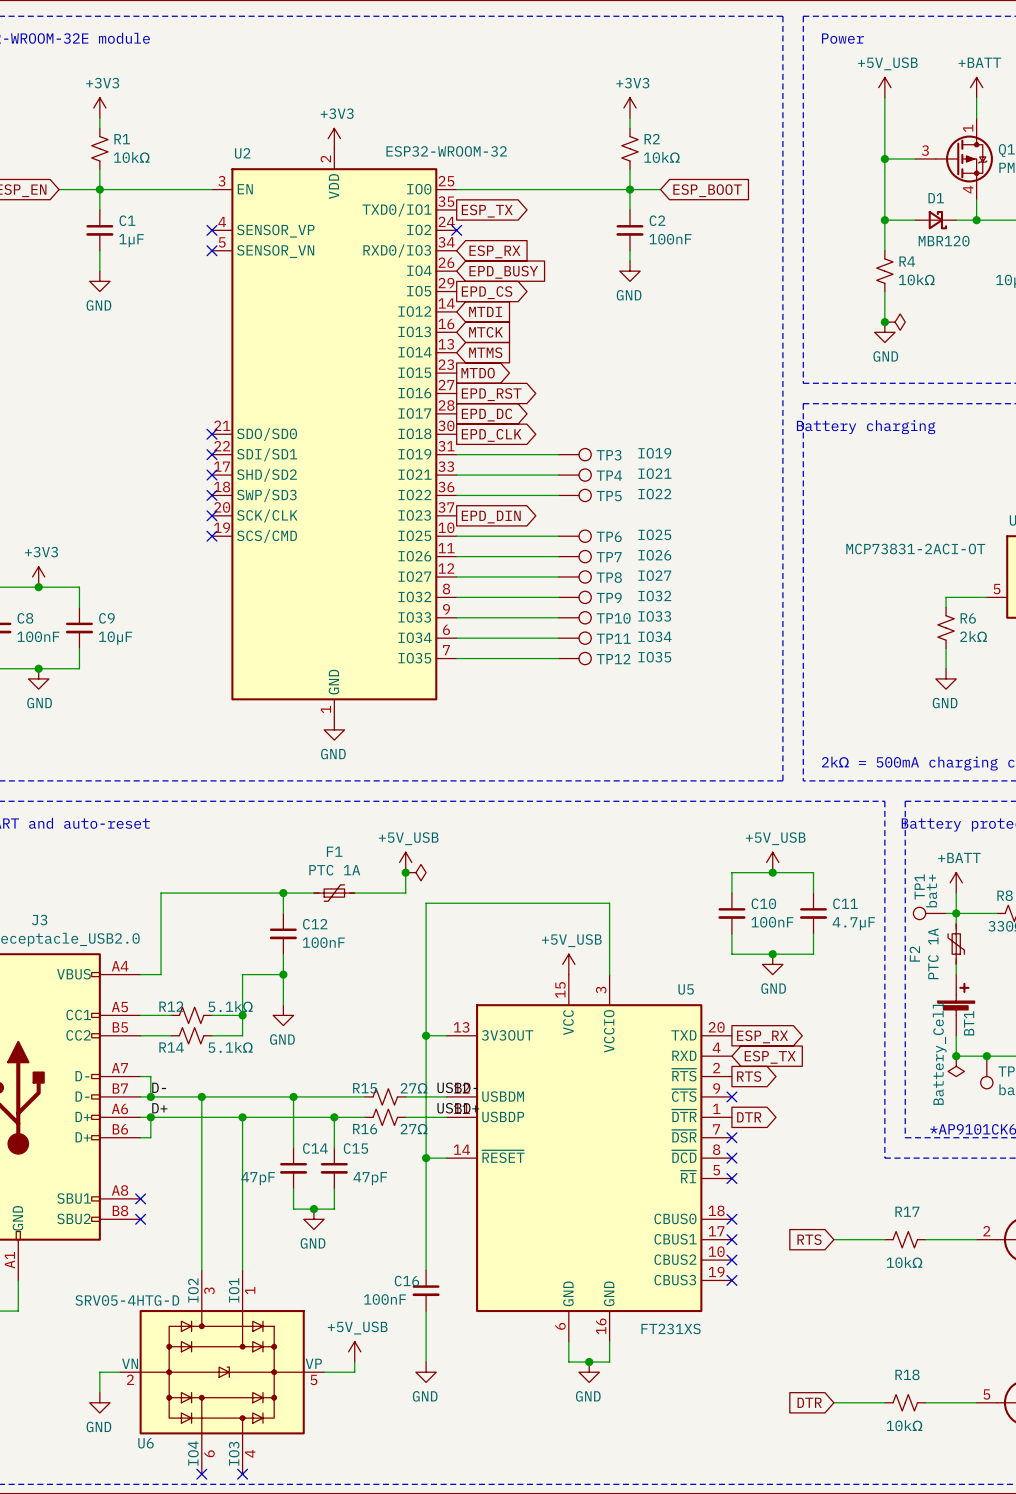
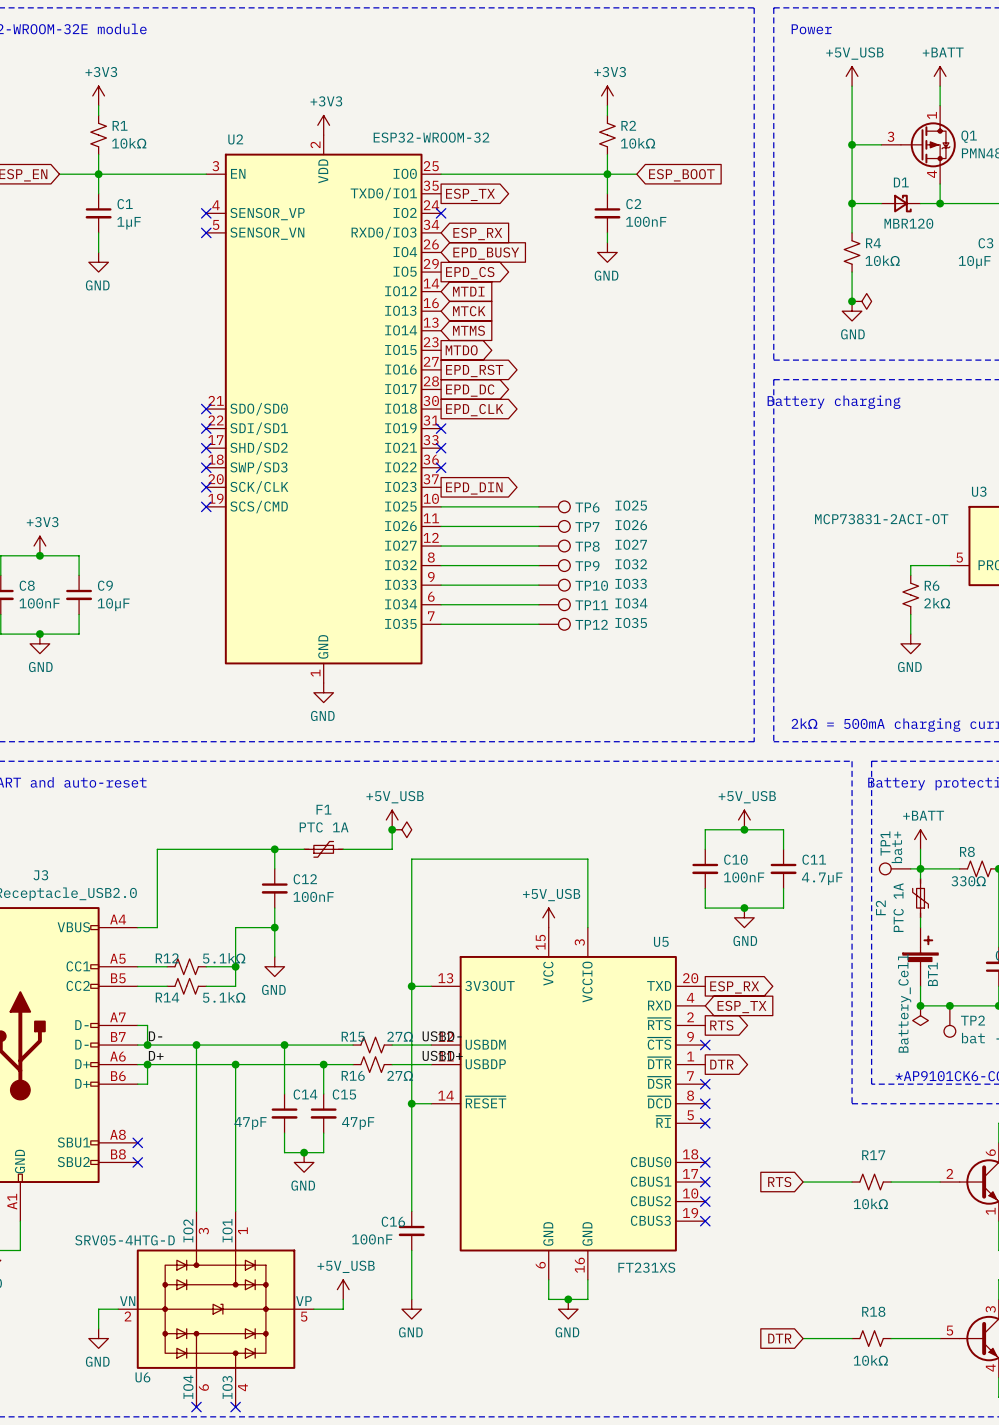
wire: (456, 454) (558, 454) -> none
no-connect mark: none -> (441, 428)
TP3: IO19 (574, 454) -> none
wire: (456, 475) (558, 475) -> none
no-connect mark: none -> (441, 448)
TP4: IO21 (574, 475) -> none
wire: (456, 495) (558, 495) -> none
no-connect mark: none -> (441, 467)
TP5: IO22 (574, 495) -> none

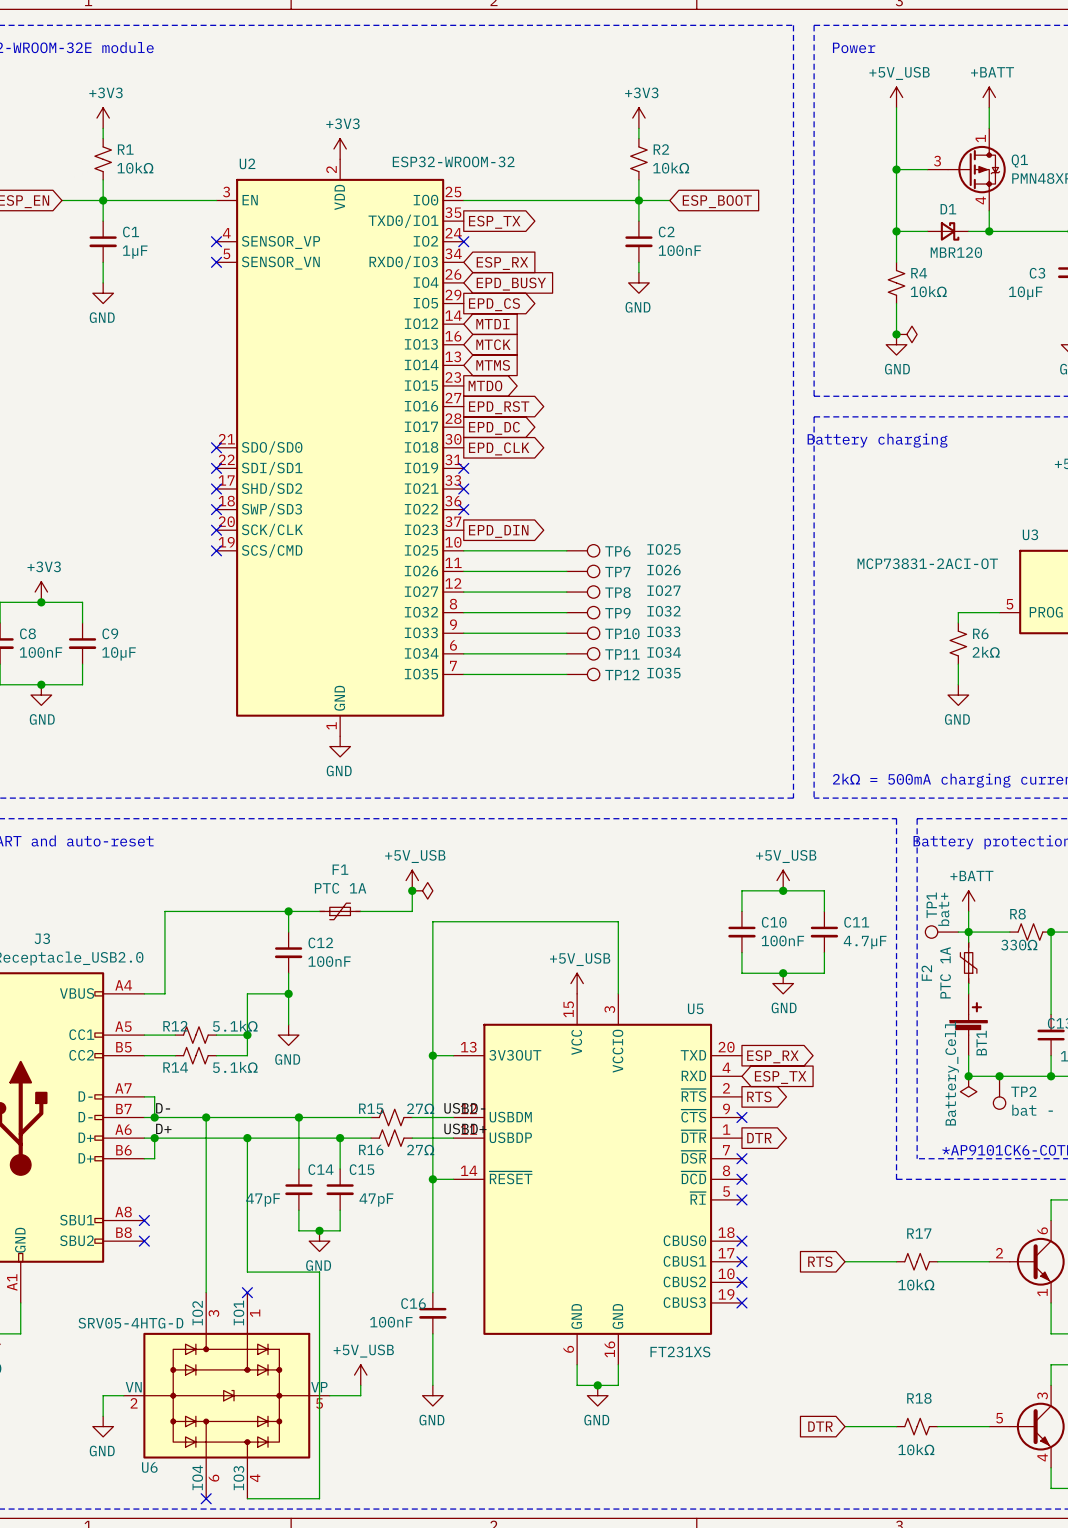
wire: (235, 1191) (235, 1211) -> (247, 1272) (319, 1272) (319, 1498) (247, 1498)
no-connect mark: none -> (247, 1292)
no-connect mark: (235, 1407) -> none

